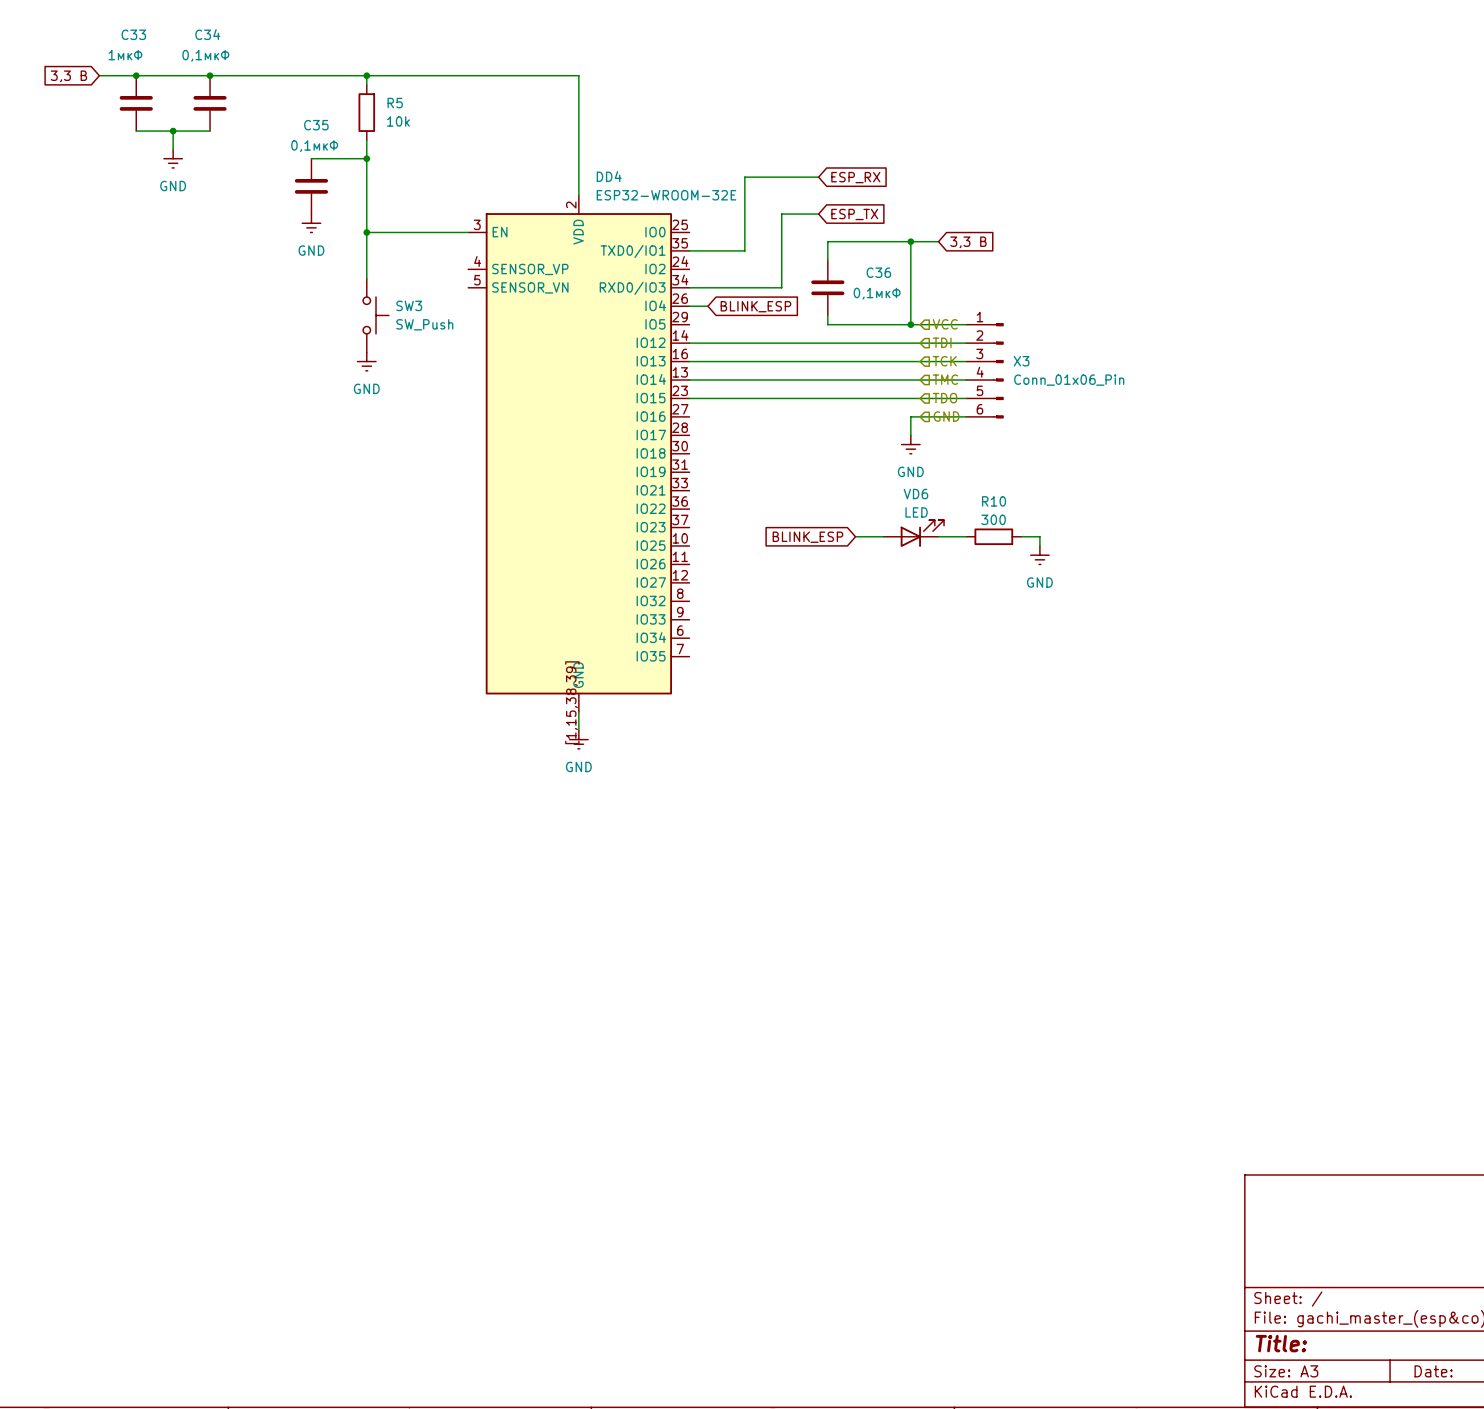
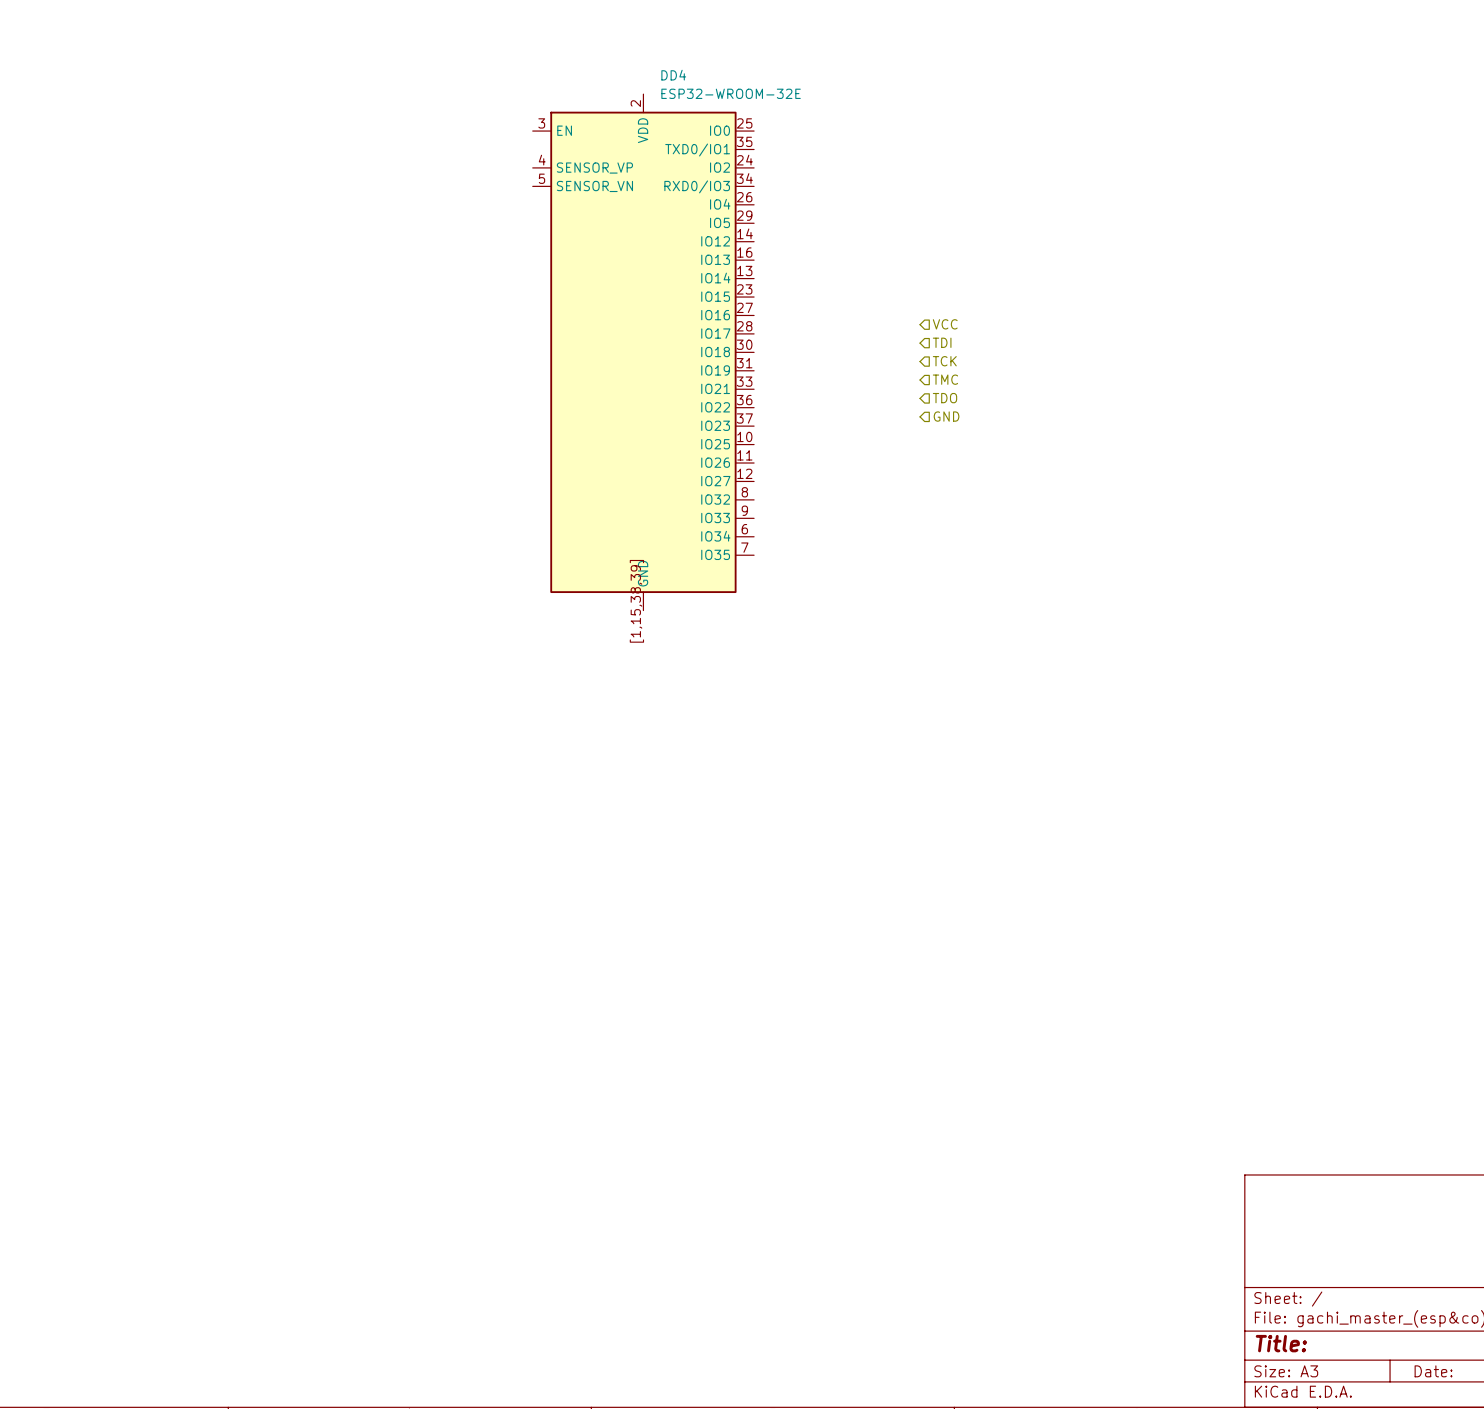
wire: (99, 75) (578, 75) (578, 195) -> none
junction: (136, 75) -> none
junction: (210, 75) -> none
wire: (366, 75) (366, 84) -> none
junction: (366, 75) -> none
global label: 3,3 В (68, 76) -> none
C33: 1мкФ (136, 103) -> none
C34: 0,1мкФ (210, 103) -> none
R5: 10k (366, 112) -> none
wire: (136, 131) (210, 131) -> none
wire: (173, 131) (173, 149) -> none
junction: (173, 131) -> none
wire: (366, 140) (366, 278) -> none
power symbol: GND (173, 158) -> none
wire: (311, 158) (366, 158) -> none
junction: (366, 158) -> none
wire: (818, 177) (744, 177) (744, 250) (689, 250) -> none
global label: ESP_RX (855, 177) -> none
C35: 0,1мкФ (311, 186) -> none
wire: (818, 214) (781, 214) (781, 287) (689, 287) -> none
global label: ESP_TX (854, 214) -> none
power symbol: GND (311, 223) -> none
wire: (366, 232) (468, 232) -> none
junction: (366, 232) -> none
wire: (910, 241) (910, 324) -> none
junction: (910, 241) -> none
wire: (938, 241) (827, 241) (827, 260) -> none
global label: 3,3 В (968, 242) -> none
C36: 0,1мкФ (827, 287) -> none
global label: BLINK_ESP (755, 306) -> none
SW3: SW_Push (376, 315) -> none
wire: (827, 315) (827, 324) (966, 324) -> none
junction: (910, 324) -> none
wire: (689, 343) (966, 343) -> none
power symbol: GND (366, 361) -> none
wire: (689, 361) (966, 361) -> none
X3: Conn_01x06_Pin (984, 370) -> none
wire: (689, 380) (966, 380) -> none
wire: (689, 398) (966, 398) -> none
wire: (966, 416) (910, 416) (910, 435) -> none
power symbol: GND (910, 444) -> none
DD4 position: (578, 453) -> (643, 352)
VD6: LED (913, 533) -> none
wire: (855, 536) (883, 536) -> none
wire: (938, 536) (966, 536) -> none
R10: 300 (993, 536) -> none
wire: (1021, 536) (1039, 536) (1039, 545) -> none
global label: BLINK_ESP (807, 537) -> none
power symbol: GND (1039, 555) -> none
wire: (578, 711) (578, 730) -> none
power symbol: GND (578, 739) -> none

